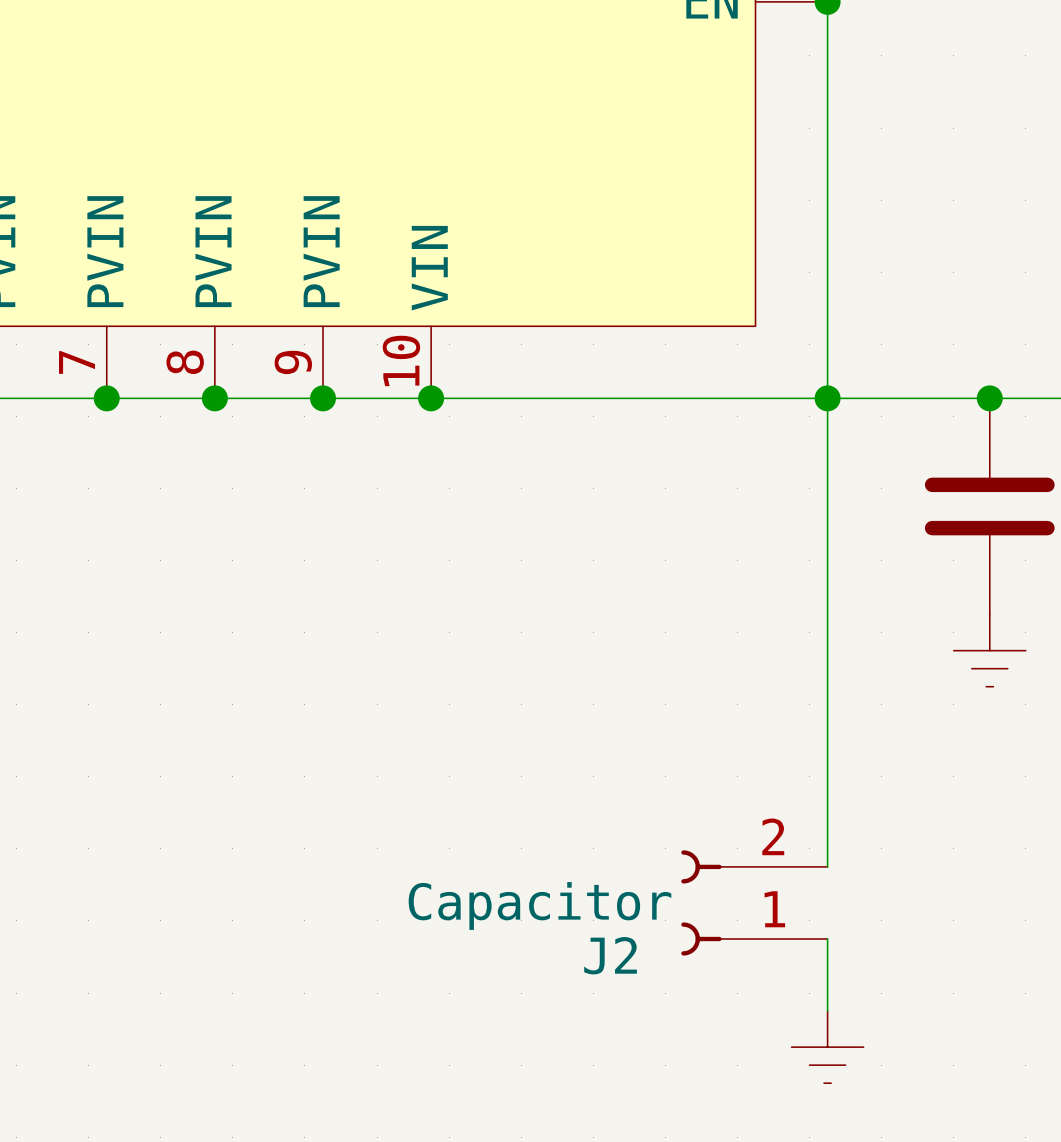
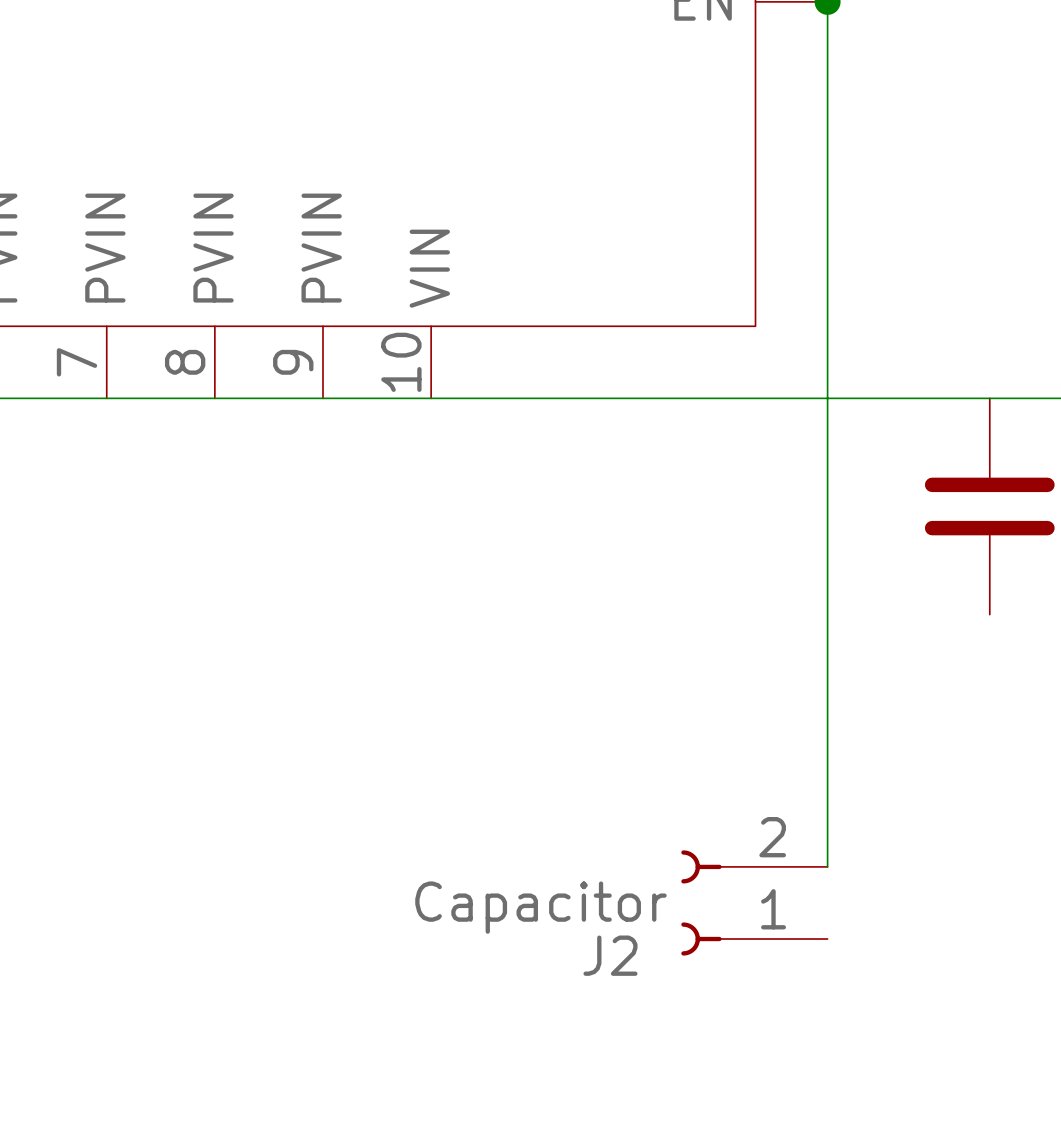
junction: (106, 398) -> none
junction: (214, 398) -> none
junction: (322, 398) -> none
junction: (431, 398) -> none
junction: (827, 398) -> none
junction: (989, 398) -> none
power symbol: (989, 650) -> none
wire: (827, 939) (827, 1011) -> none
power symbol: (827, 1047) -> none

